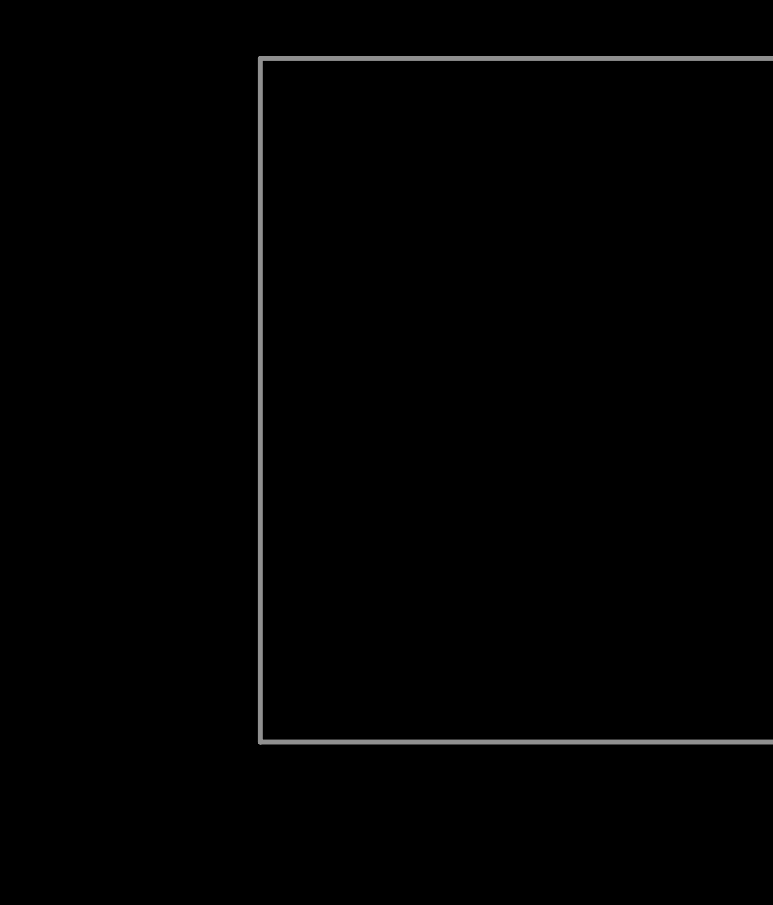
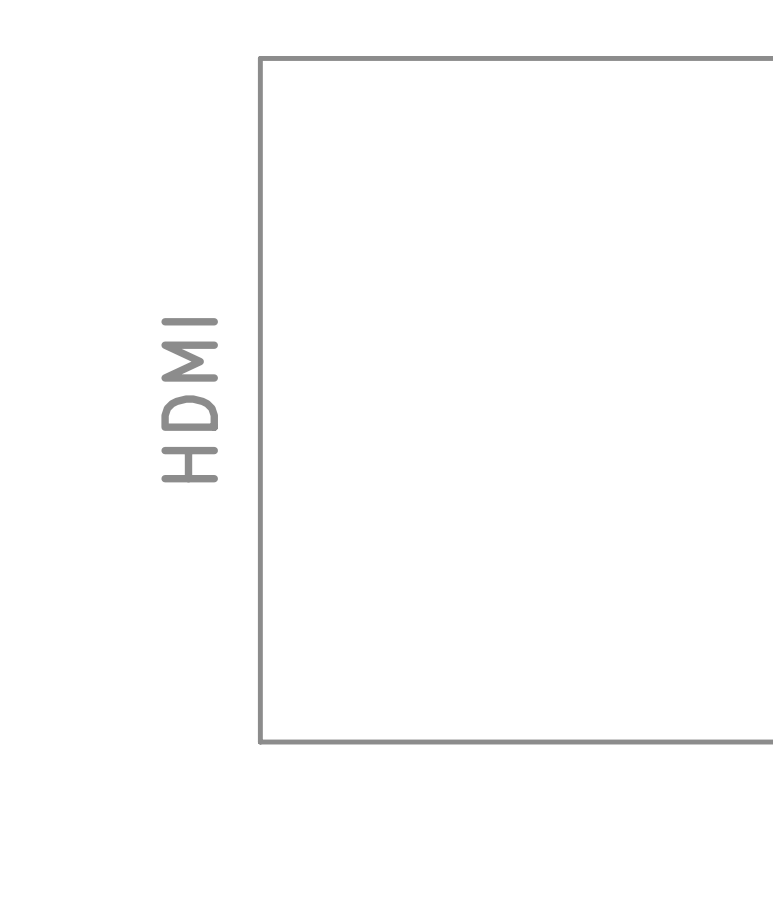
part value: none -> HDMI (189, 400)

